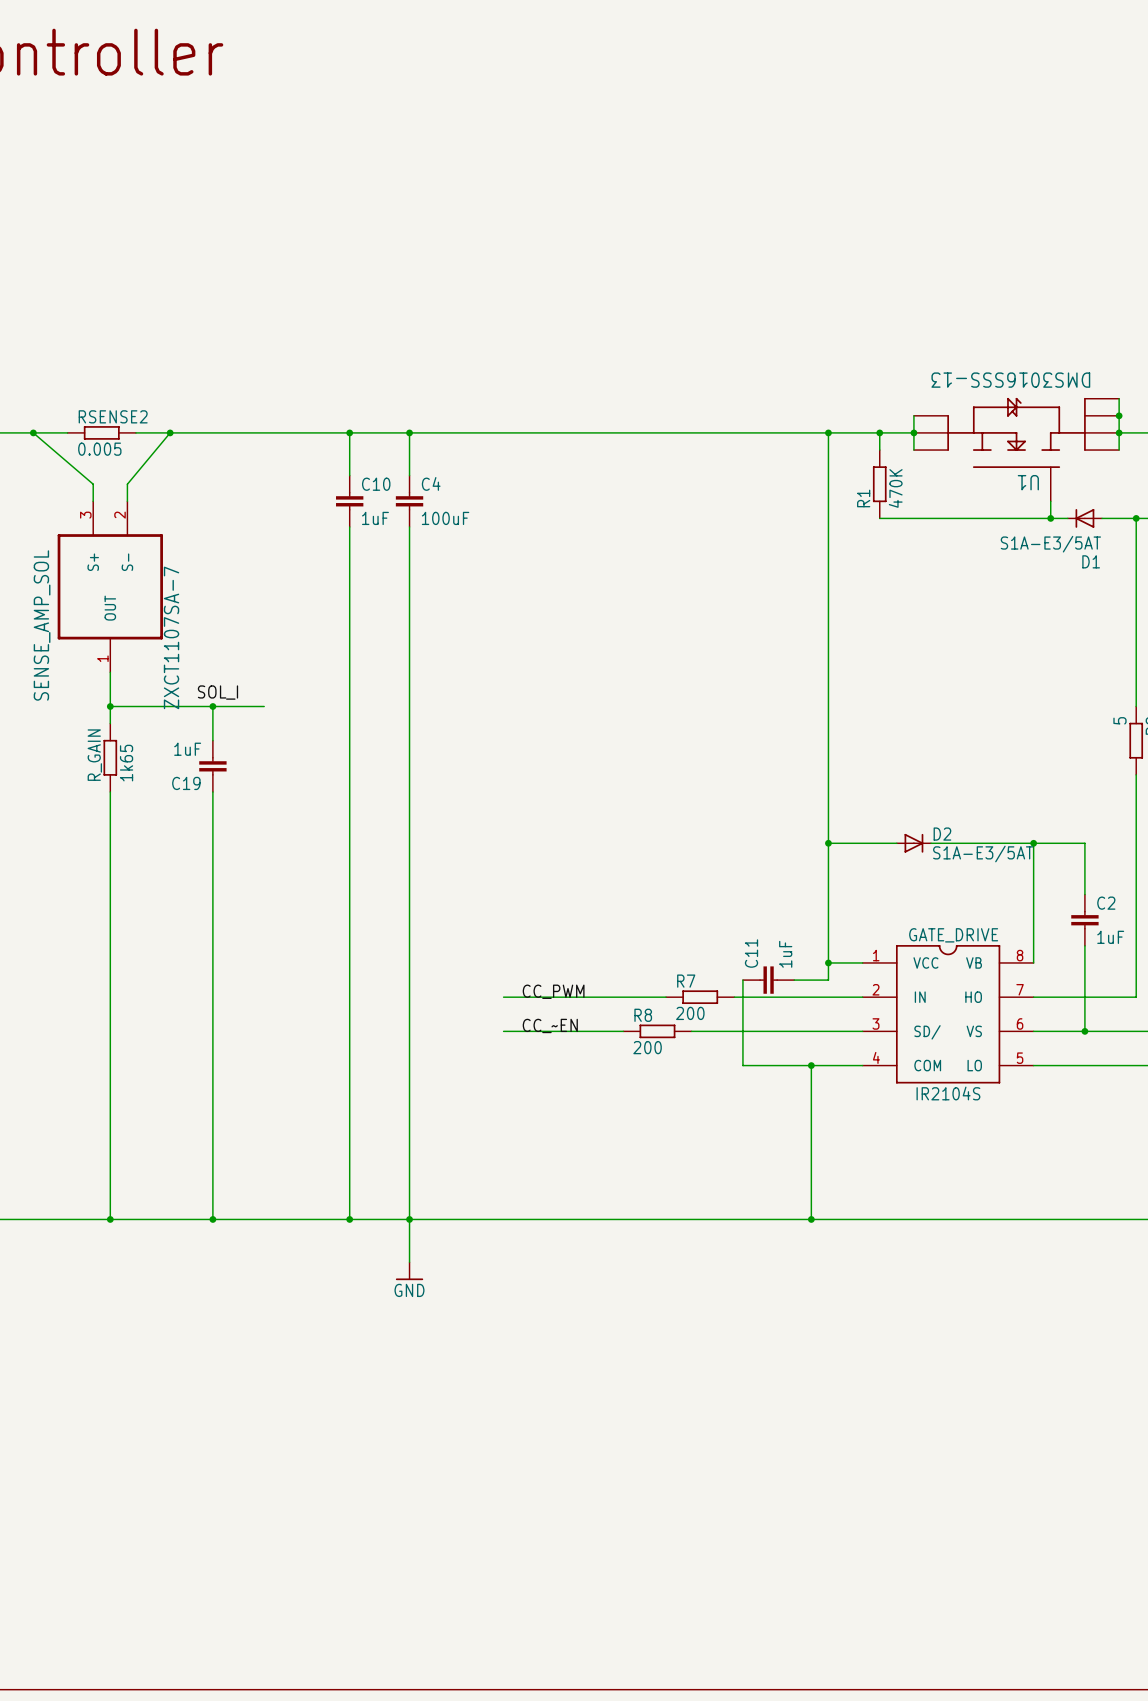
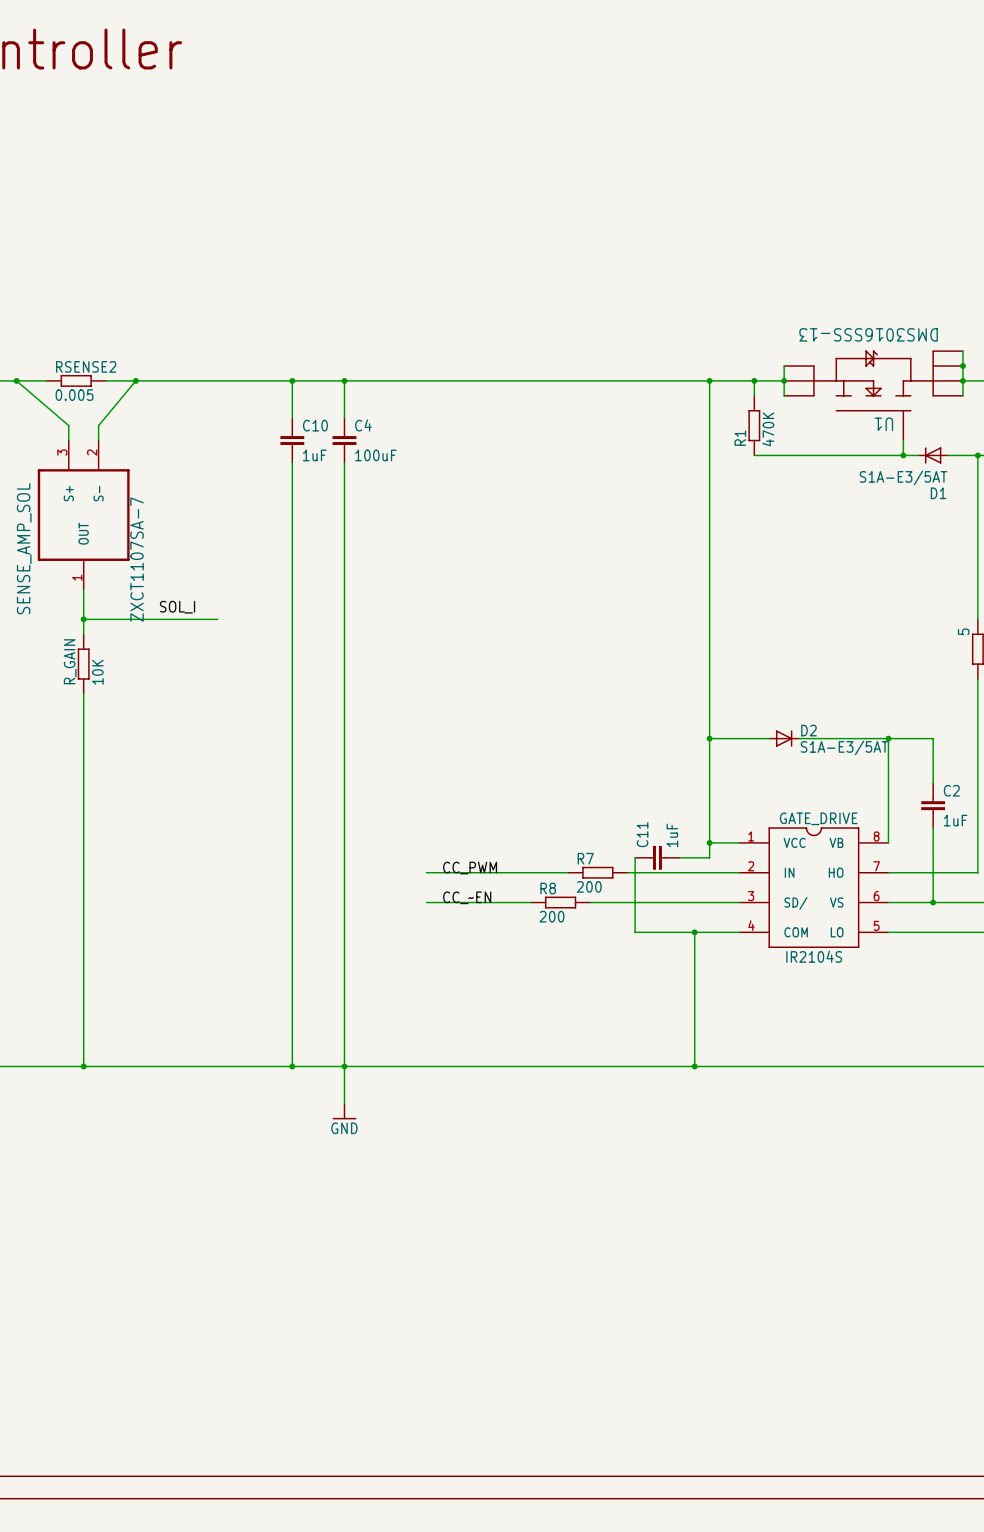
wire: (212, 706) (212, 740) -> none
junction: (212, 706) -> none
R_GAIN value: 1k65 (126, 763) -> 10K (97, 672)
C19: 1uF (212, 766) -> none
wire: (212, 791) (212, 1219) -> none
junction: (212, 1219) -> none

